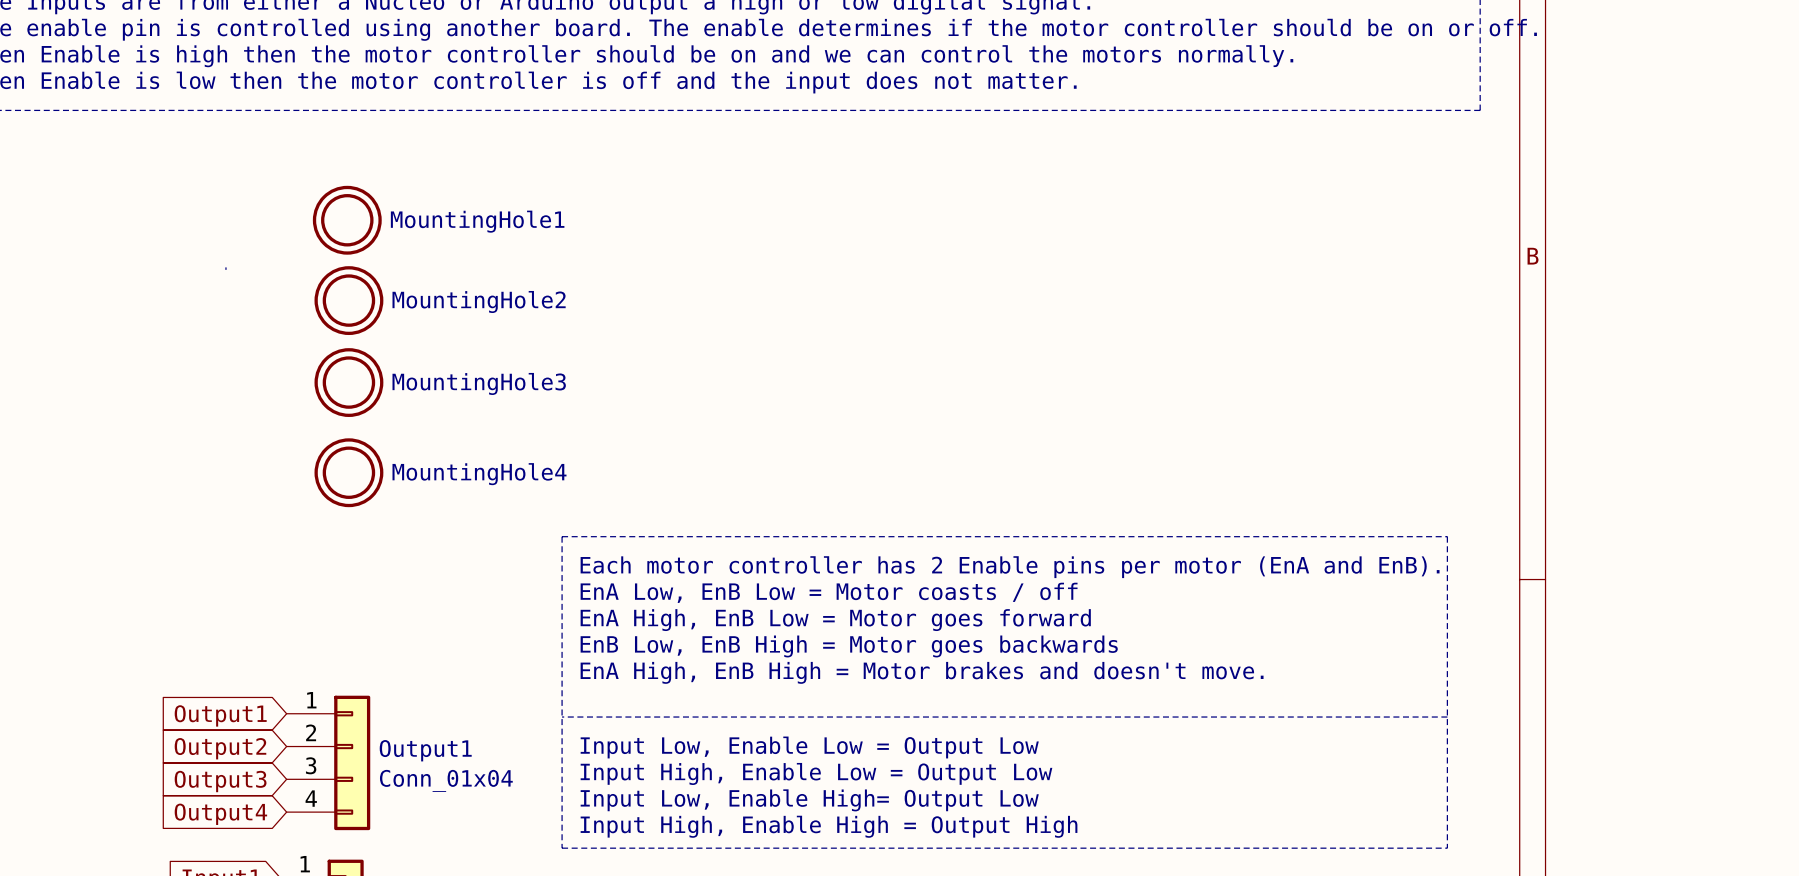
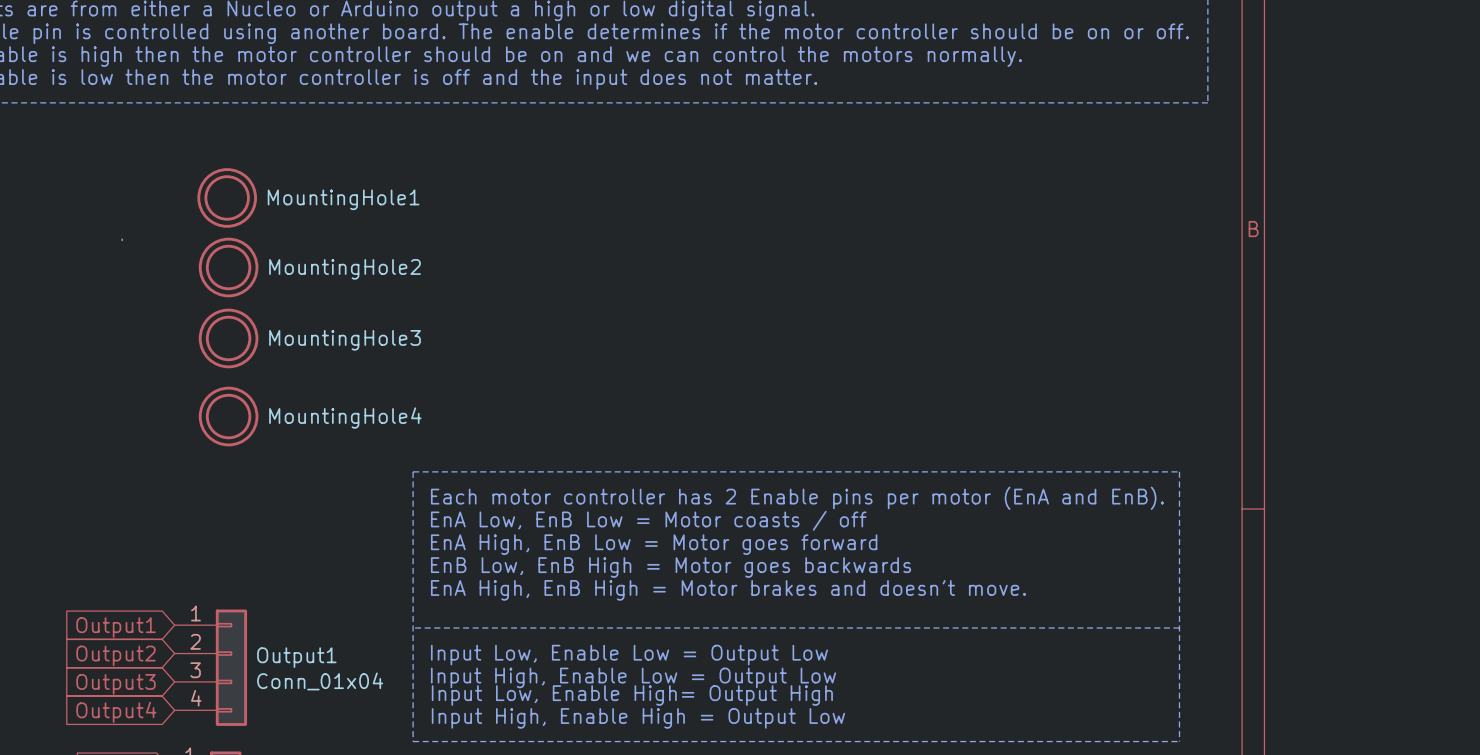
text: Input Low, Enable High= Output Low (809, 800) -> Input Low, Enable High= Output High (632, 695)
text: Input High, Enable High = Output High (829, 826) -> Input High, Enable High = Output Low (638, 718)

